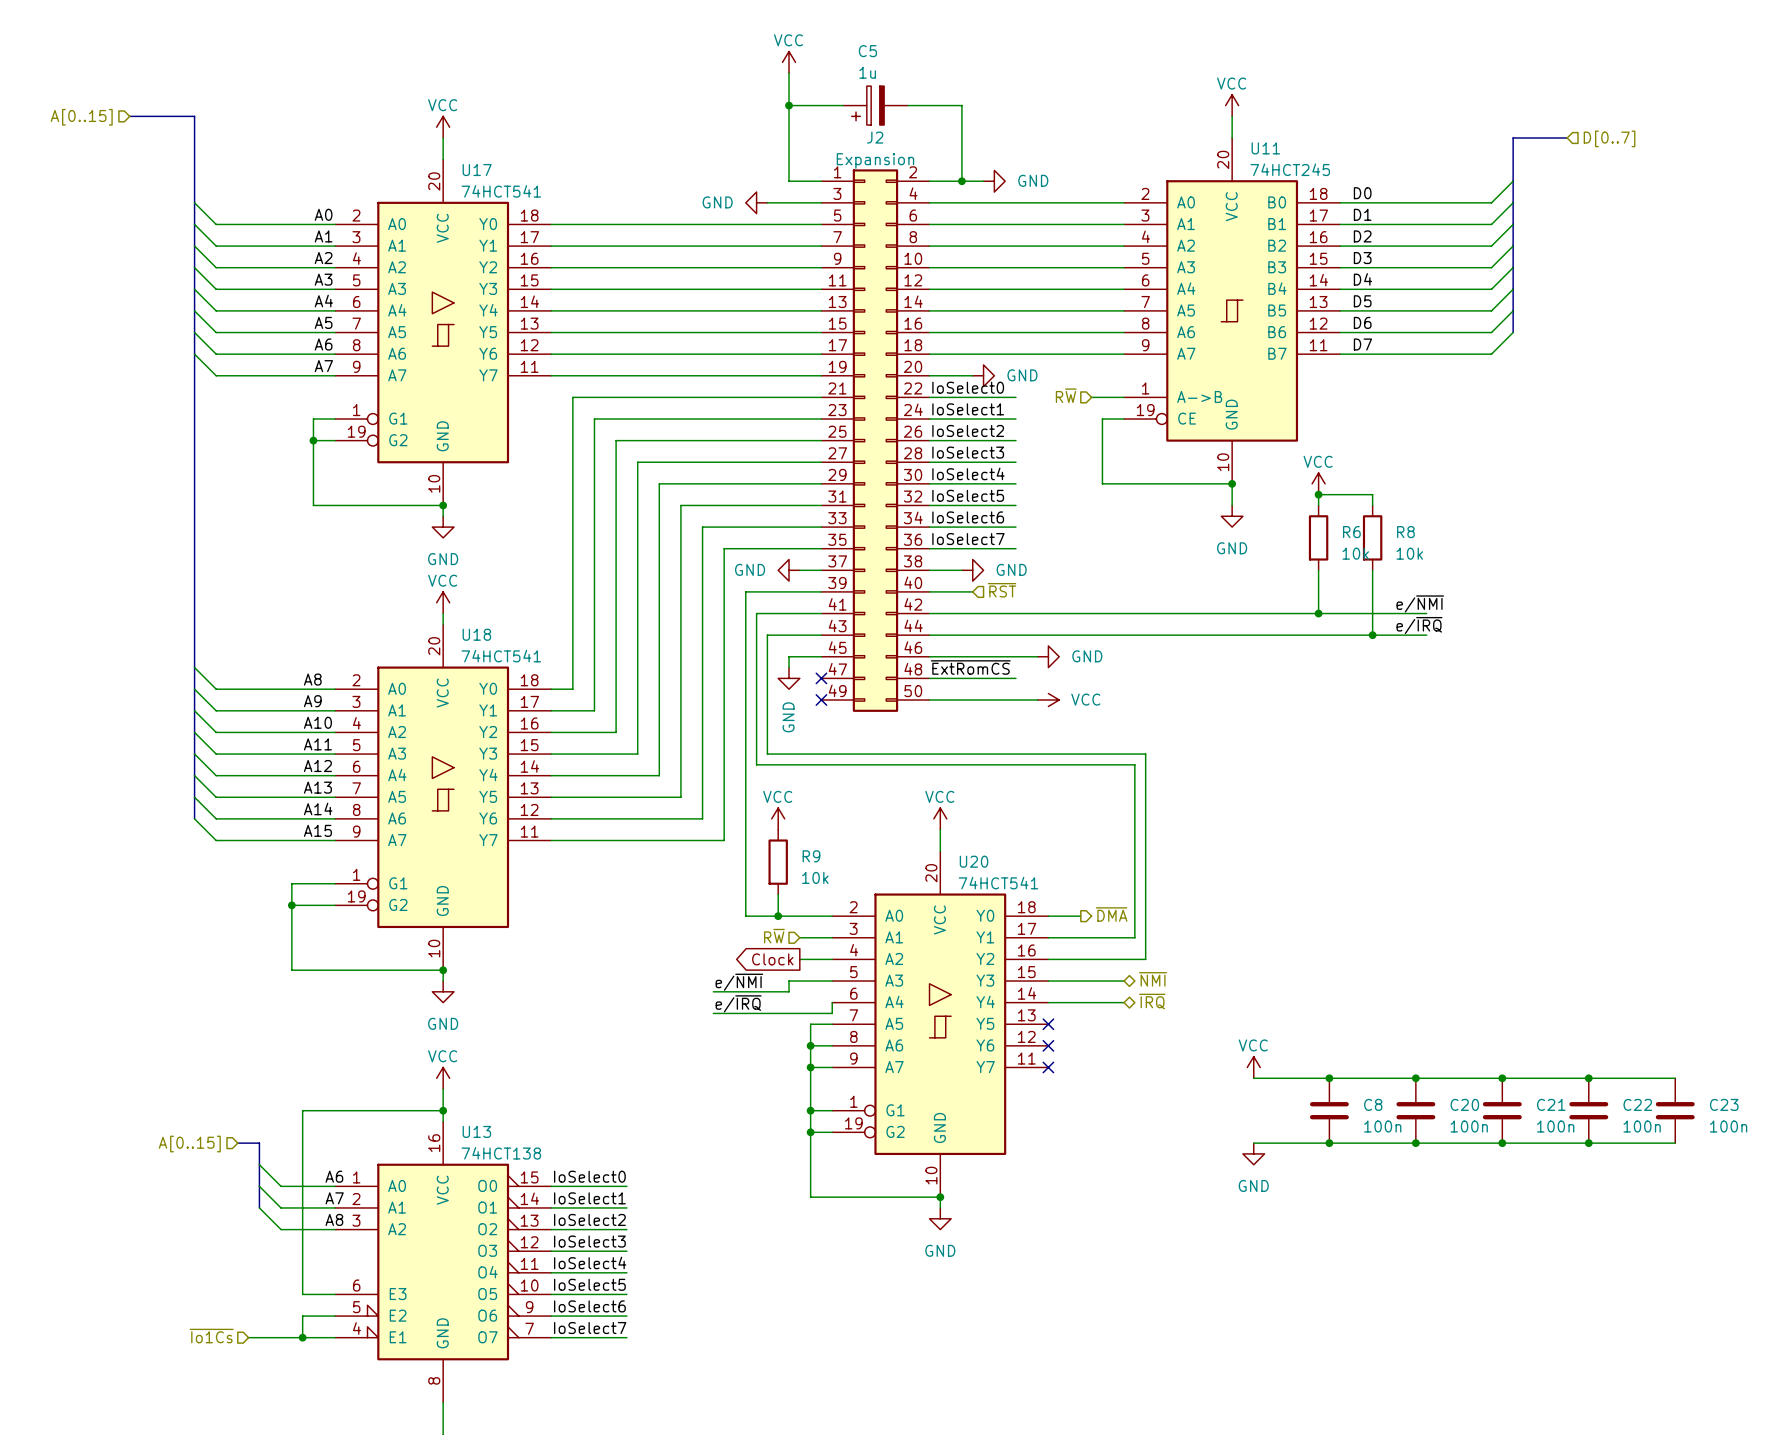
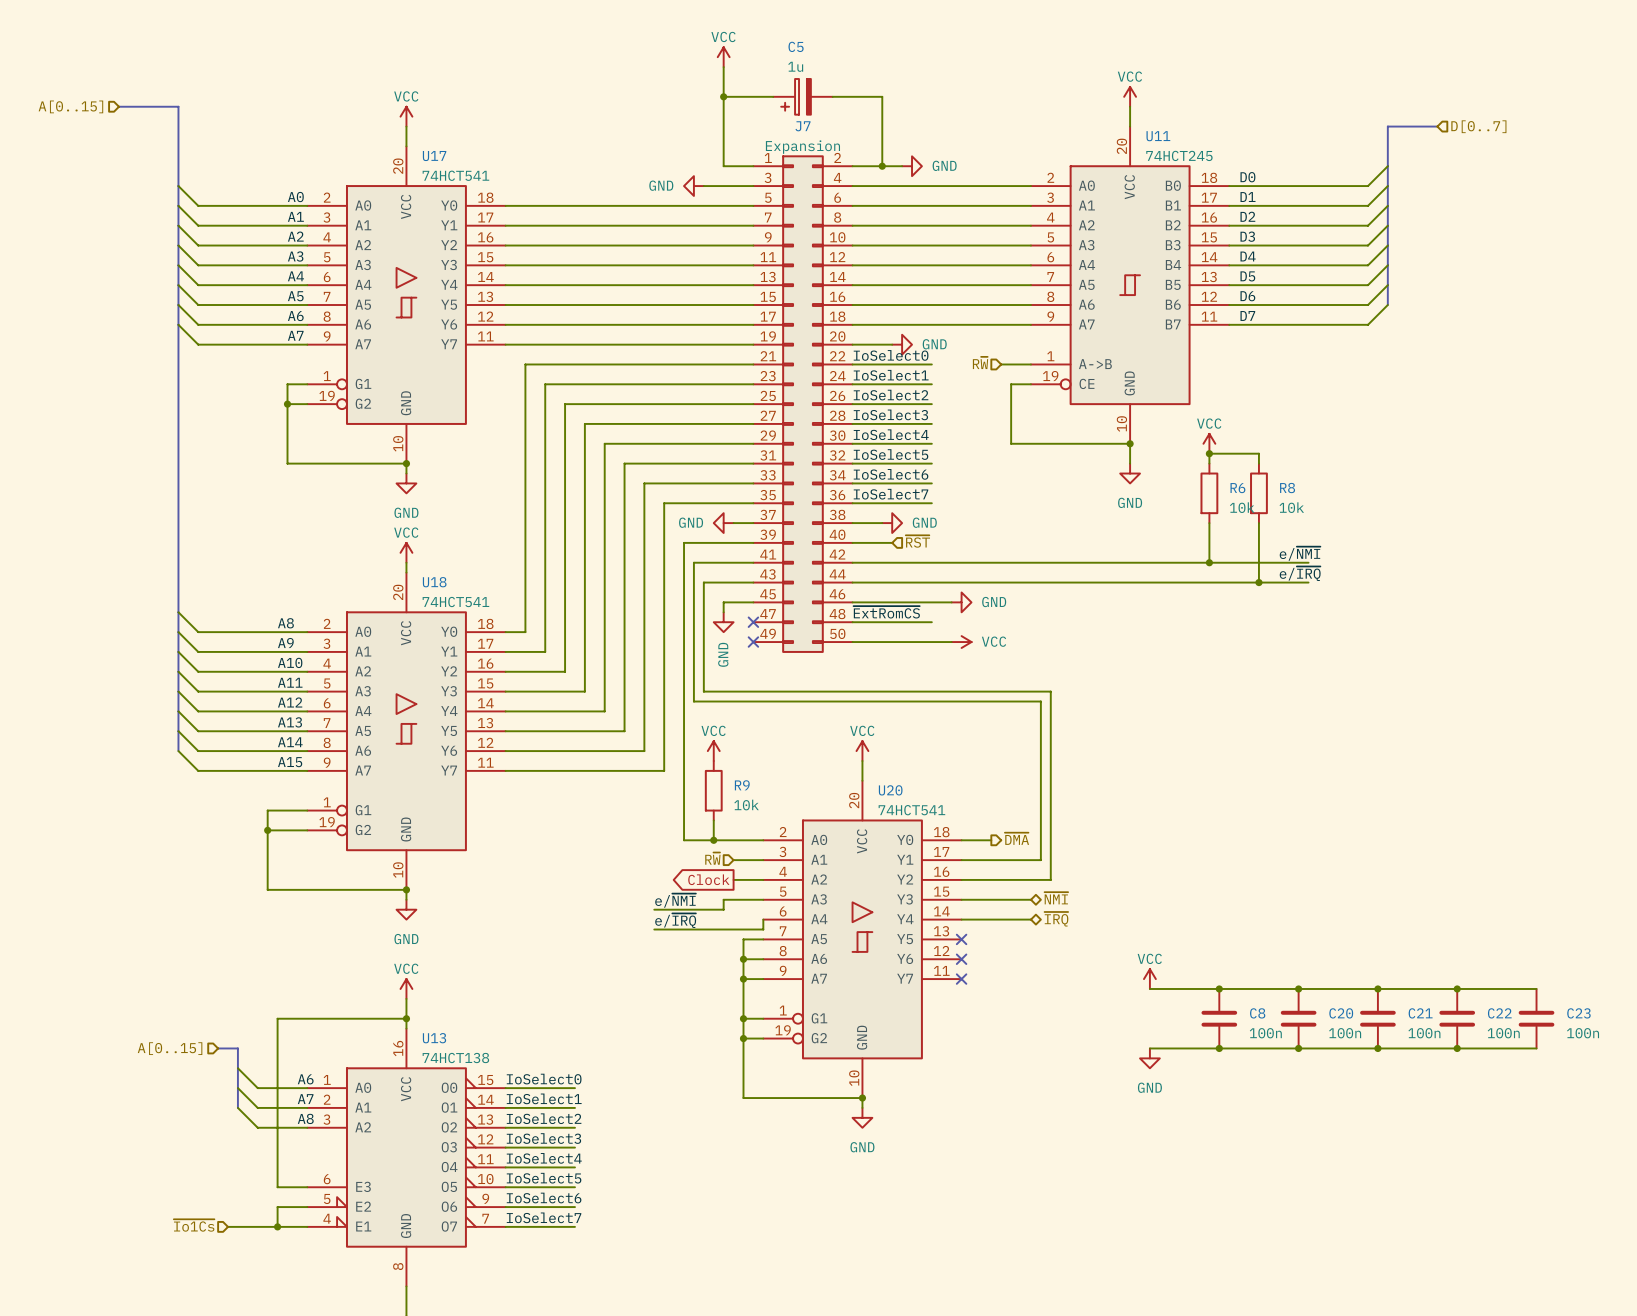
J2 name: J2 (875, 137) -> J7 (803, 126)

